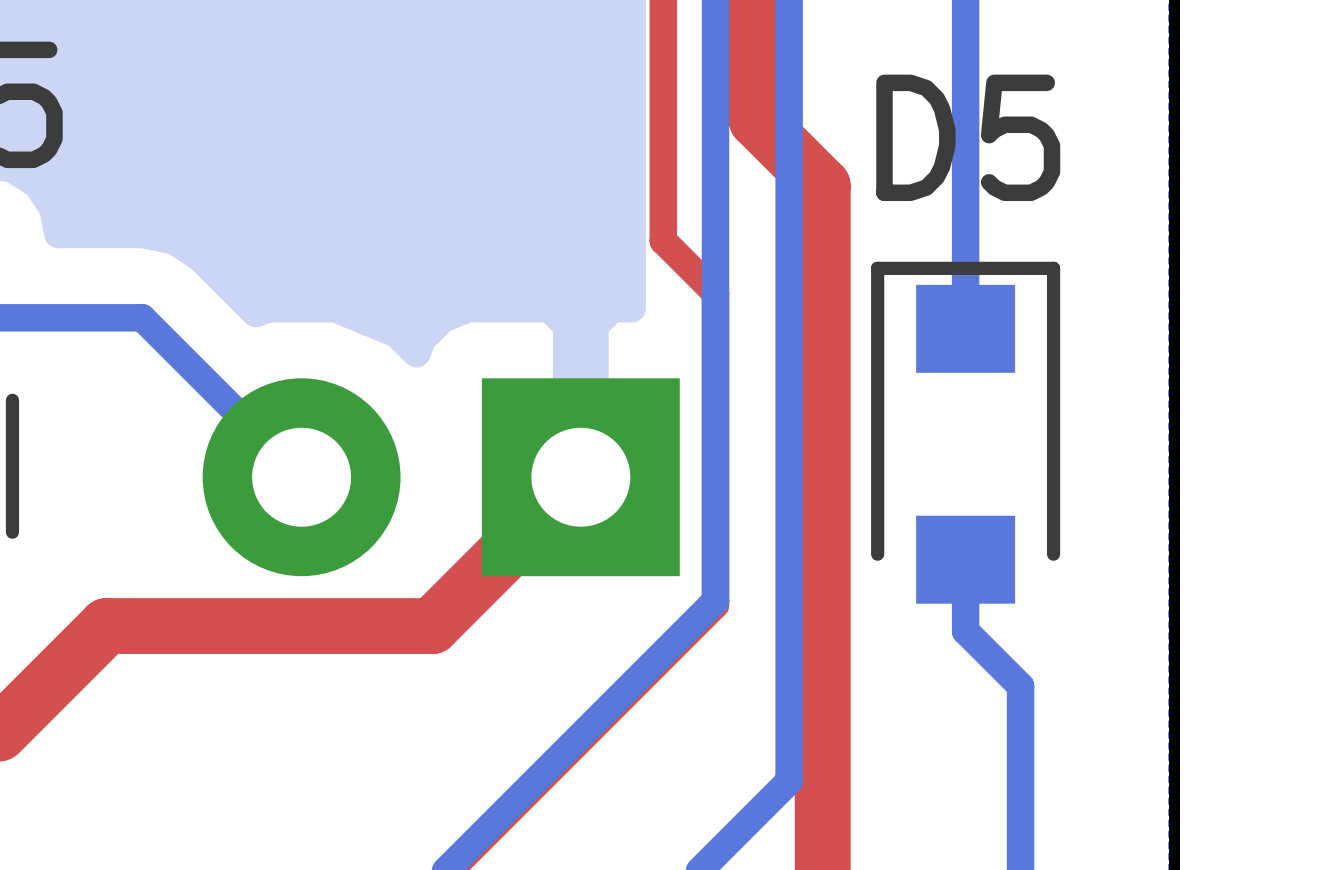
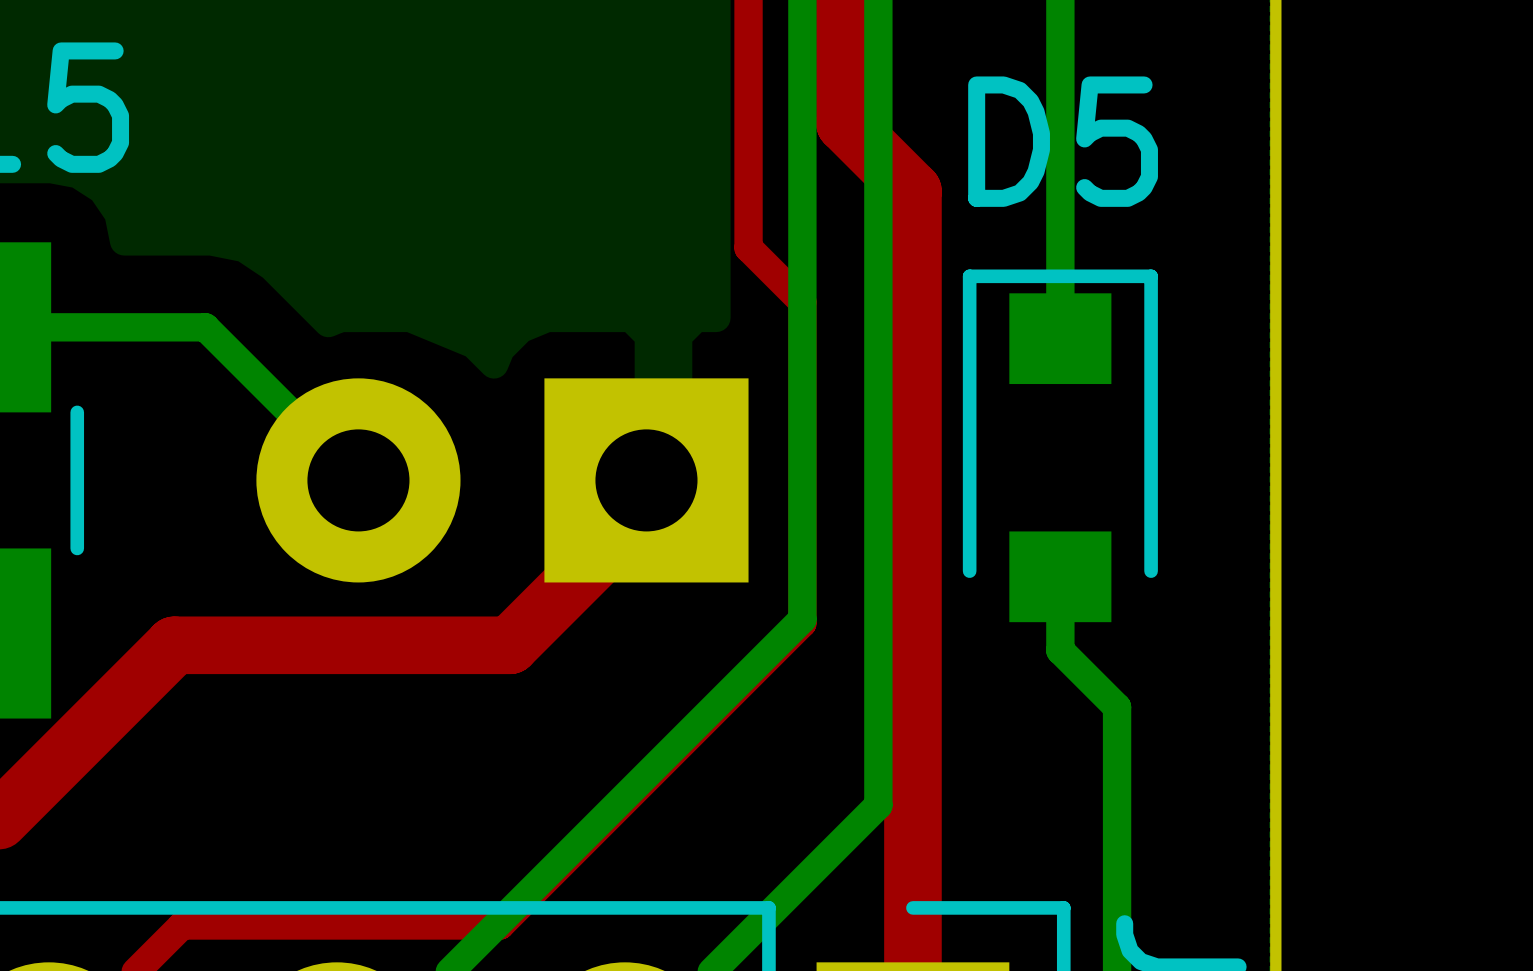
bottom track: (136, 317) (142, 317) (301, 477) -> (205, 327) (358, 480)
part position: (441, 477) -> (502, 480)

